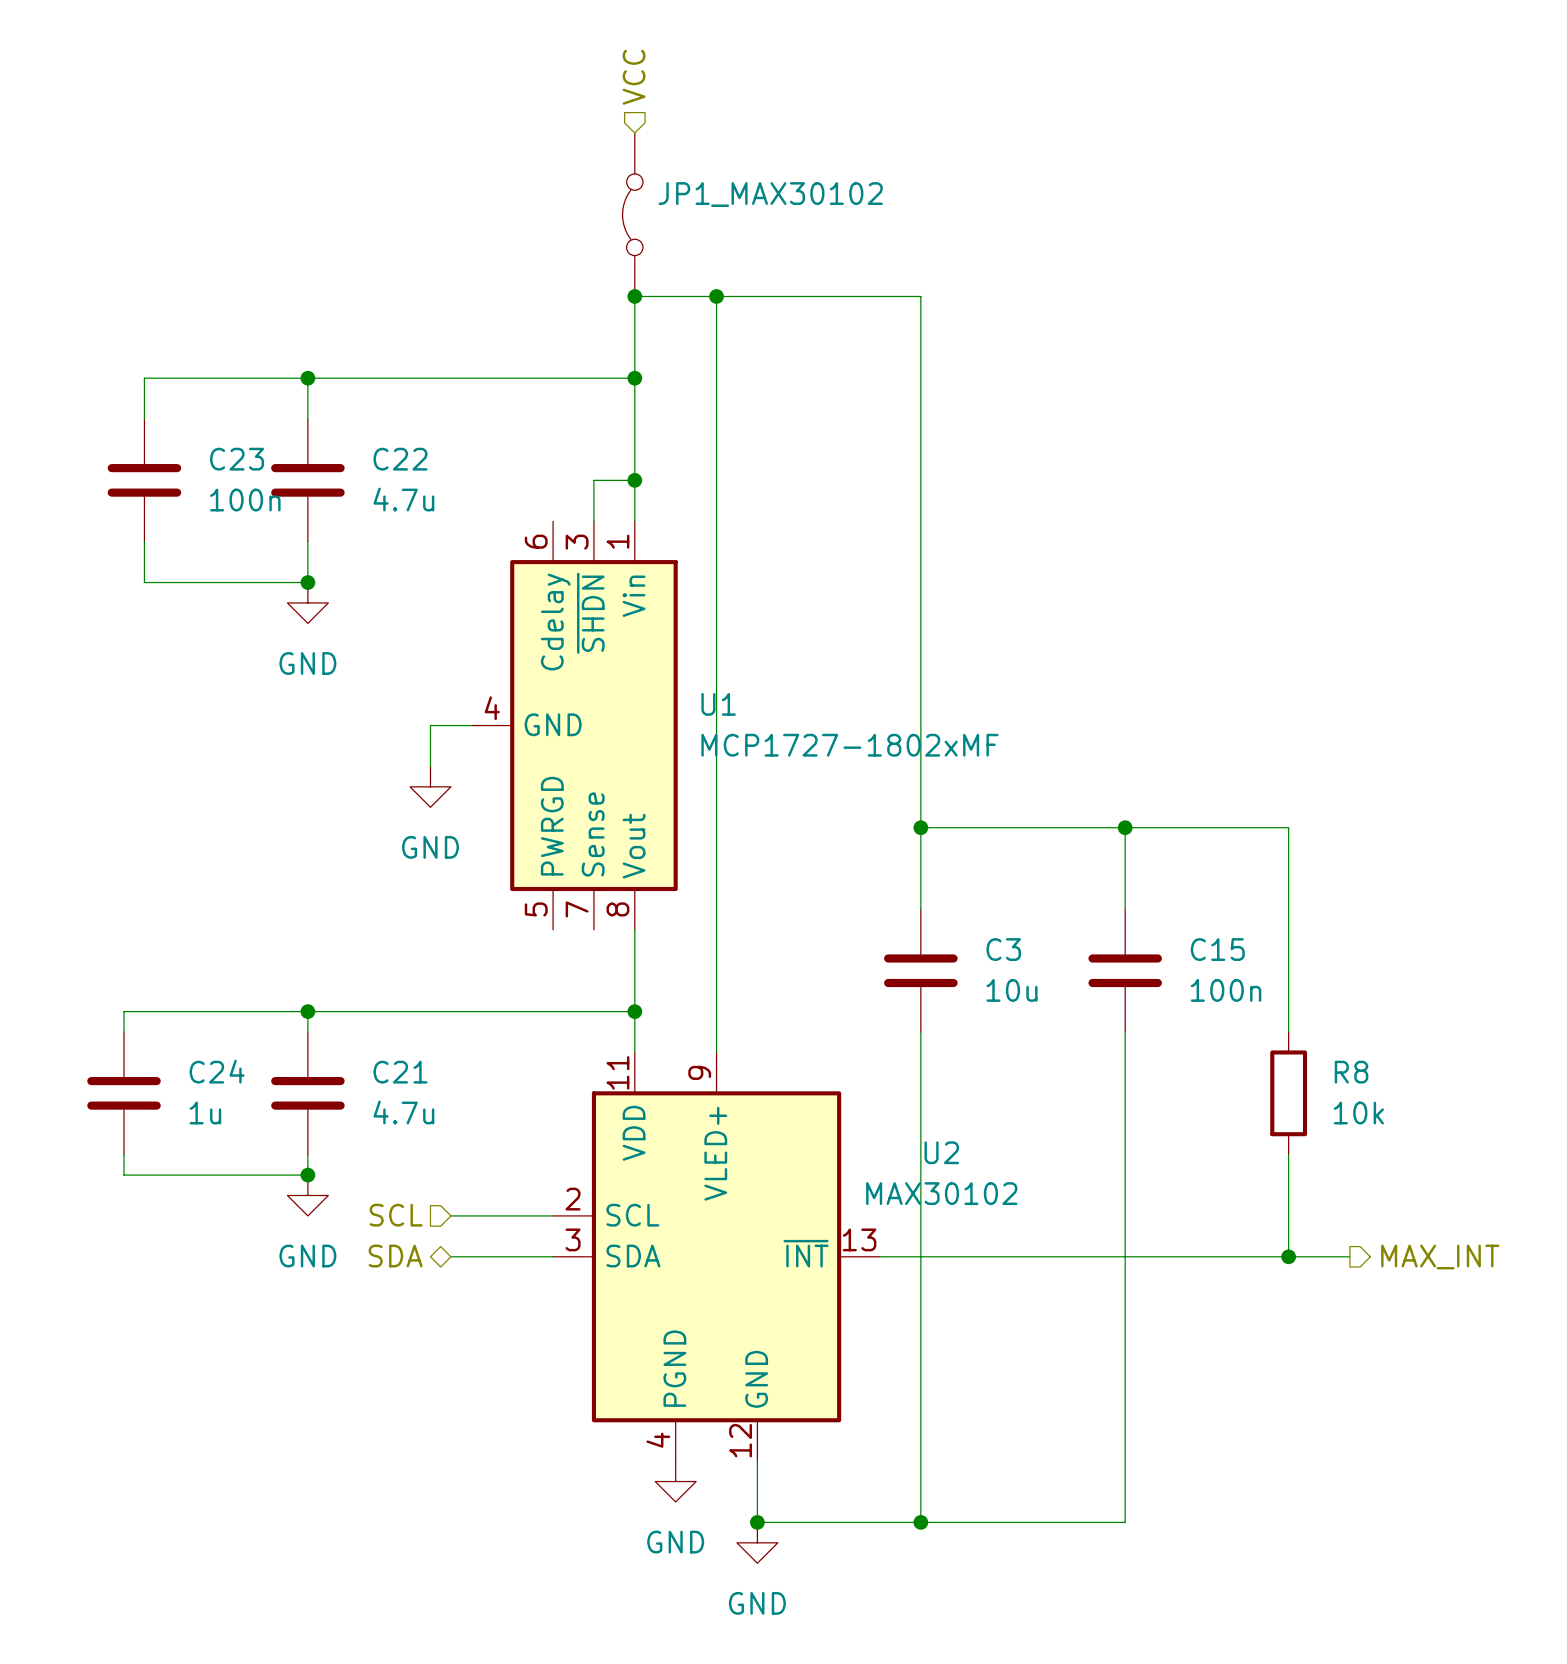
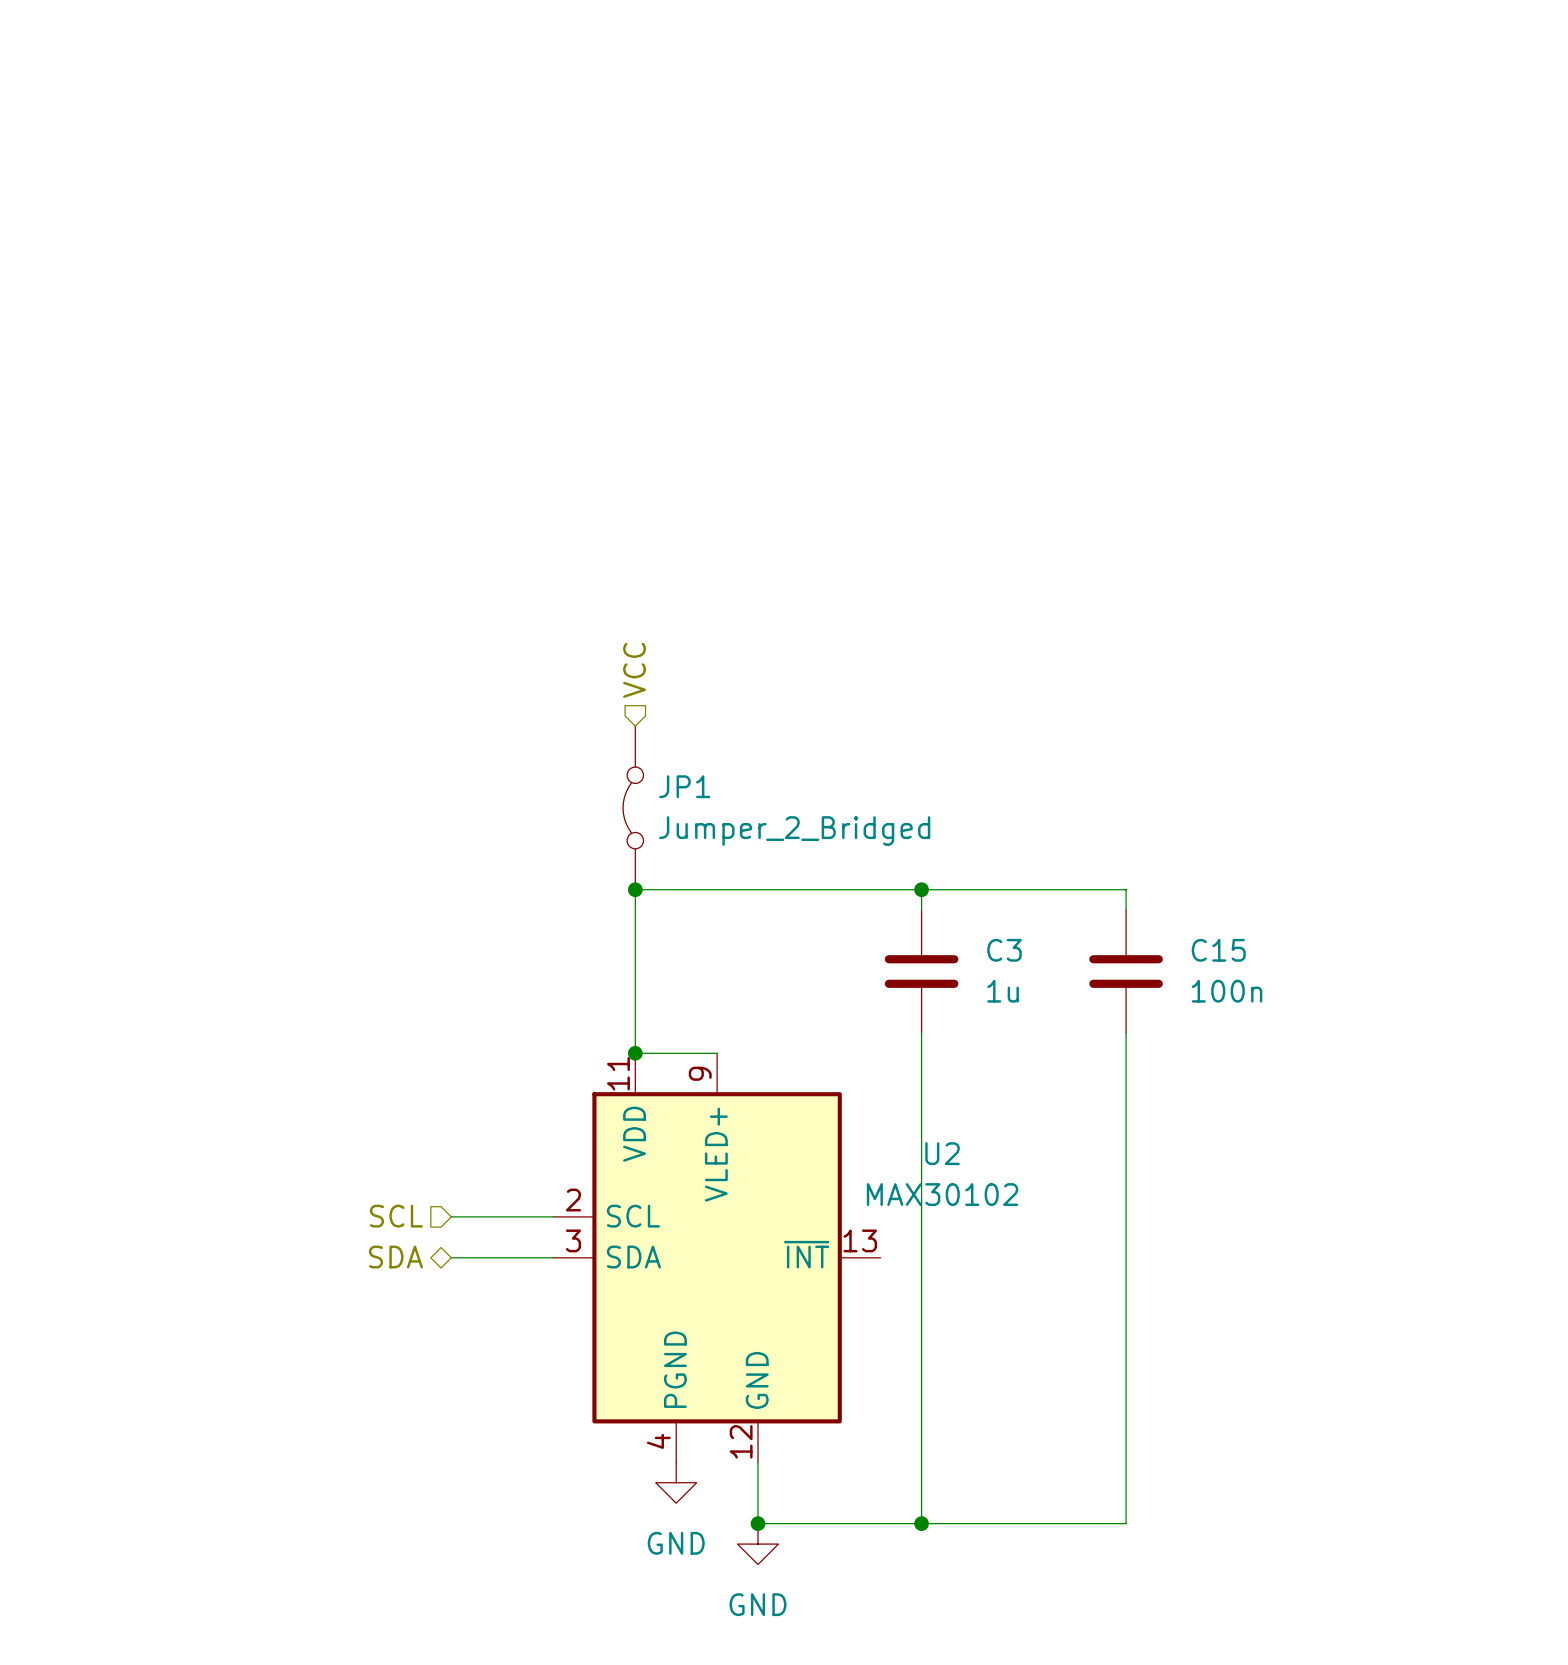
hierarchical label: VCC (634, 77) -> none
JP1_MAX30102: (632, 214) -> none
junction: (634, 296) -> none
wire: (716, 296) (716, 1052) -> (635, 1053) (717, 1053)
junction: (716, 296) -> none
wire: (307, 378) (307, 419) -> none
junction: (307, 378) -> none
wire: (634, 378) (144, 378) (144, 419) -> none
junction: (634, 378) -> none
C23: 100n (144, 480) -> none
C22: 4.7u (307, 480) -> none
wire: (634, 480) (593, 480) (593, 521) -> none
junction: (634, 480) -> none
wire: (634, 521) (634, 296) (920, 296) (920, 889) -> none
wire: (144, 541) (144, 582) (307, 582) (307, 541) -> none
junction: (307, 582) -> none
power symbol: GND (307, 602) -> none
hierarchical label: none -> VCC (634, 670)
wire: (471, 725) (430, 725) (430, 766) -> none
U1: MCP1727-1802xMF (574, 725) -> none
power symbol: GND (430, 786) -> none
JP1: none -> Jumper_2_Bridged (633, 807)
wire: (920, 827) (1288, 827) (1288, 1032) -> none
junction position: (920, 827) -> (921, 889)
wire: (1125, 827) (1125, 889) -> (635, 930) (635, 889) (1126, 889)
junction: (1125, 827) -> none
junction: none -> (635, 889)
C3 value: 10u (1011, 990) -> 1u (1003, 991)
wire: (307, 1011) (307, 1032) -> none
junction: (307, 1011) -> none
wire: (634, 1011) (124, 1011) (124, 1032) -> none
junction position: (634, 1011) -> (635, 1053)
C24: 1u (124, 1093) -> none
C21: 4.7u (307, 1093) -> none
R8: 10k (1288, 1093) -> none
wire: (124, 1154) (124, 1175) (307, 1175) (307, 1154) -> none
wire: (1288, 1154) (1288, 1256) -> none
junction: (307, 1175) -> none
power symbol: GND (307, 1195) -> none
wire: (879, 1256) (1349, 1256) -> none
junction: (1288, 1256) -> none
hierarchical label: MAX_INT (1440, 1257) -> none

